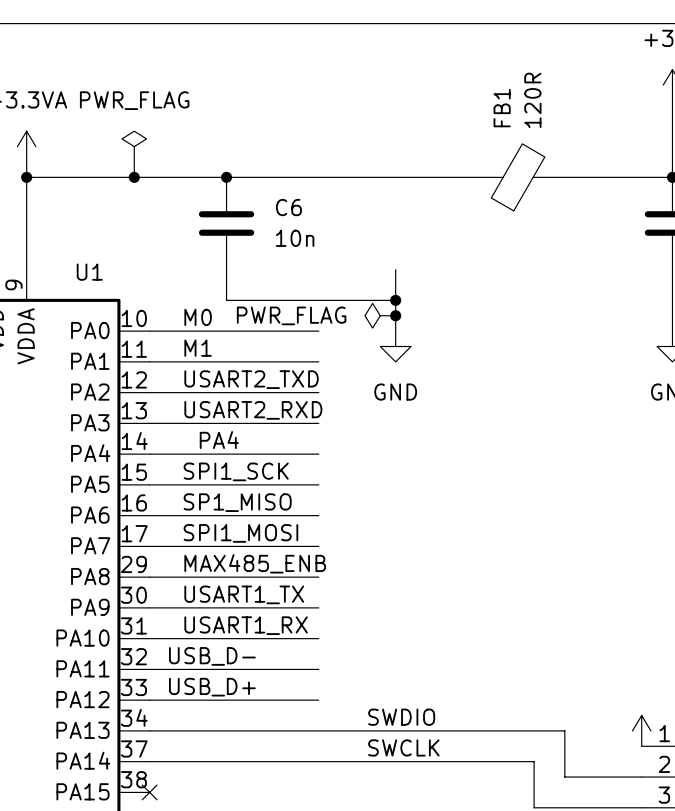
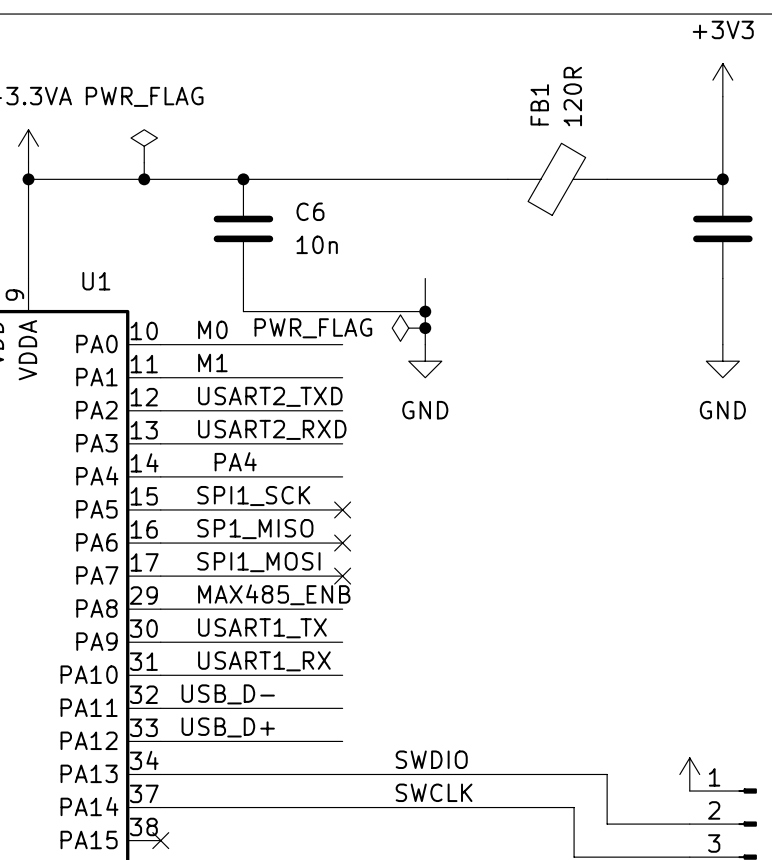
no-connect mark: none -> (342, 509)
no-connect mark: none -> (342, 543)
no-connect mark: none -> (342, 576)

